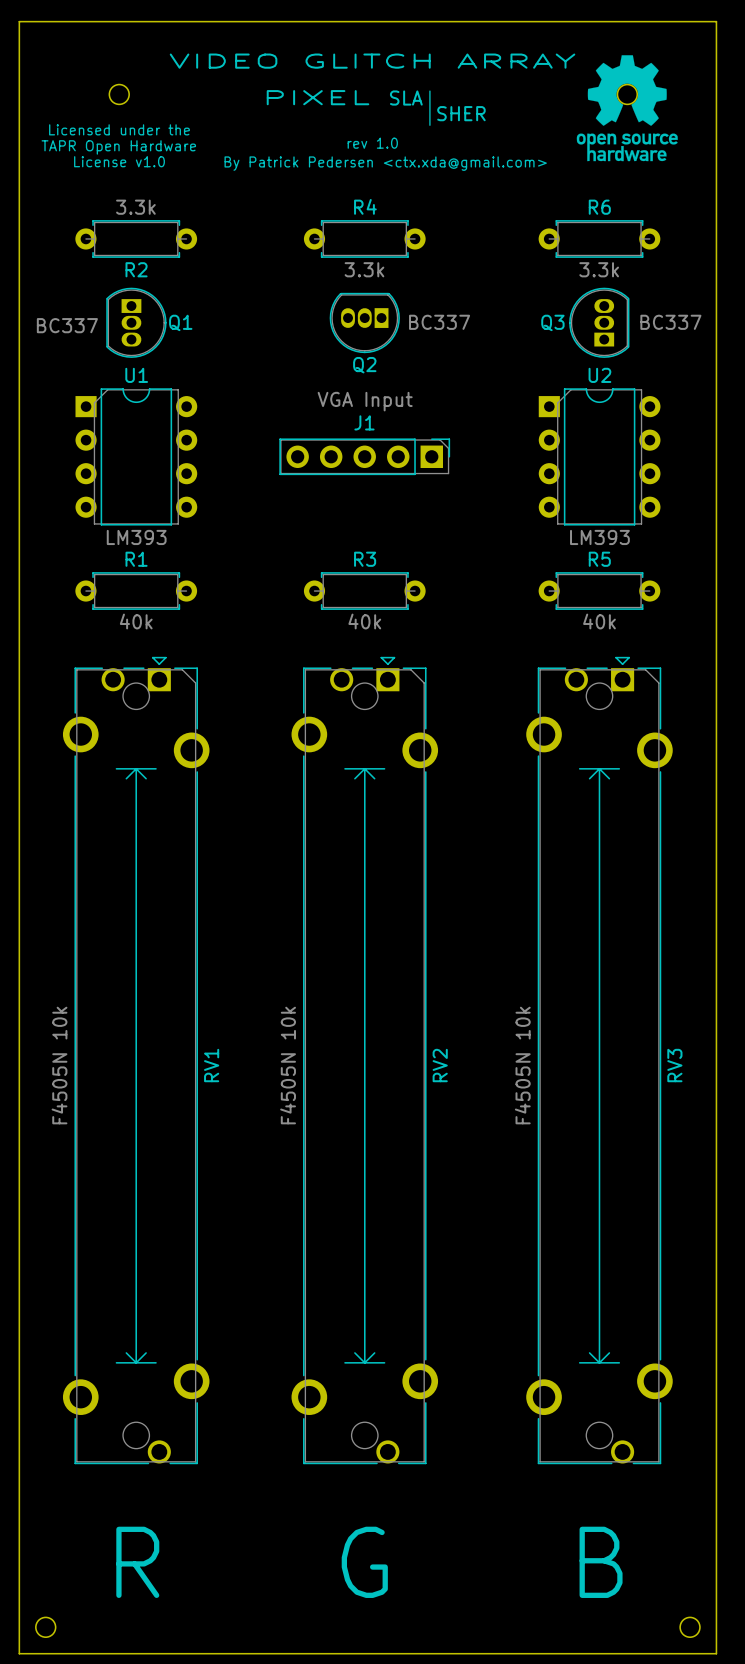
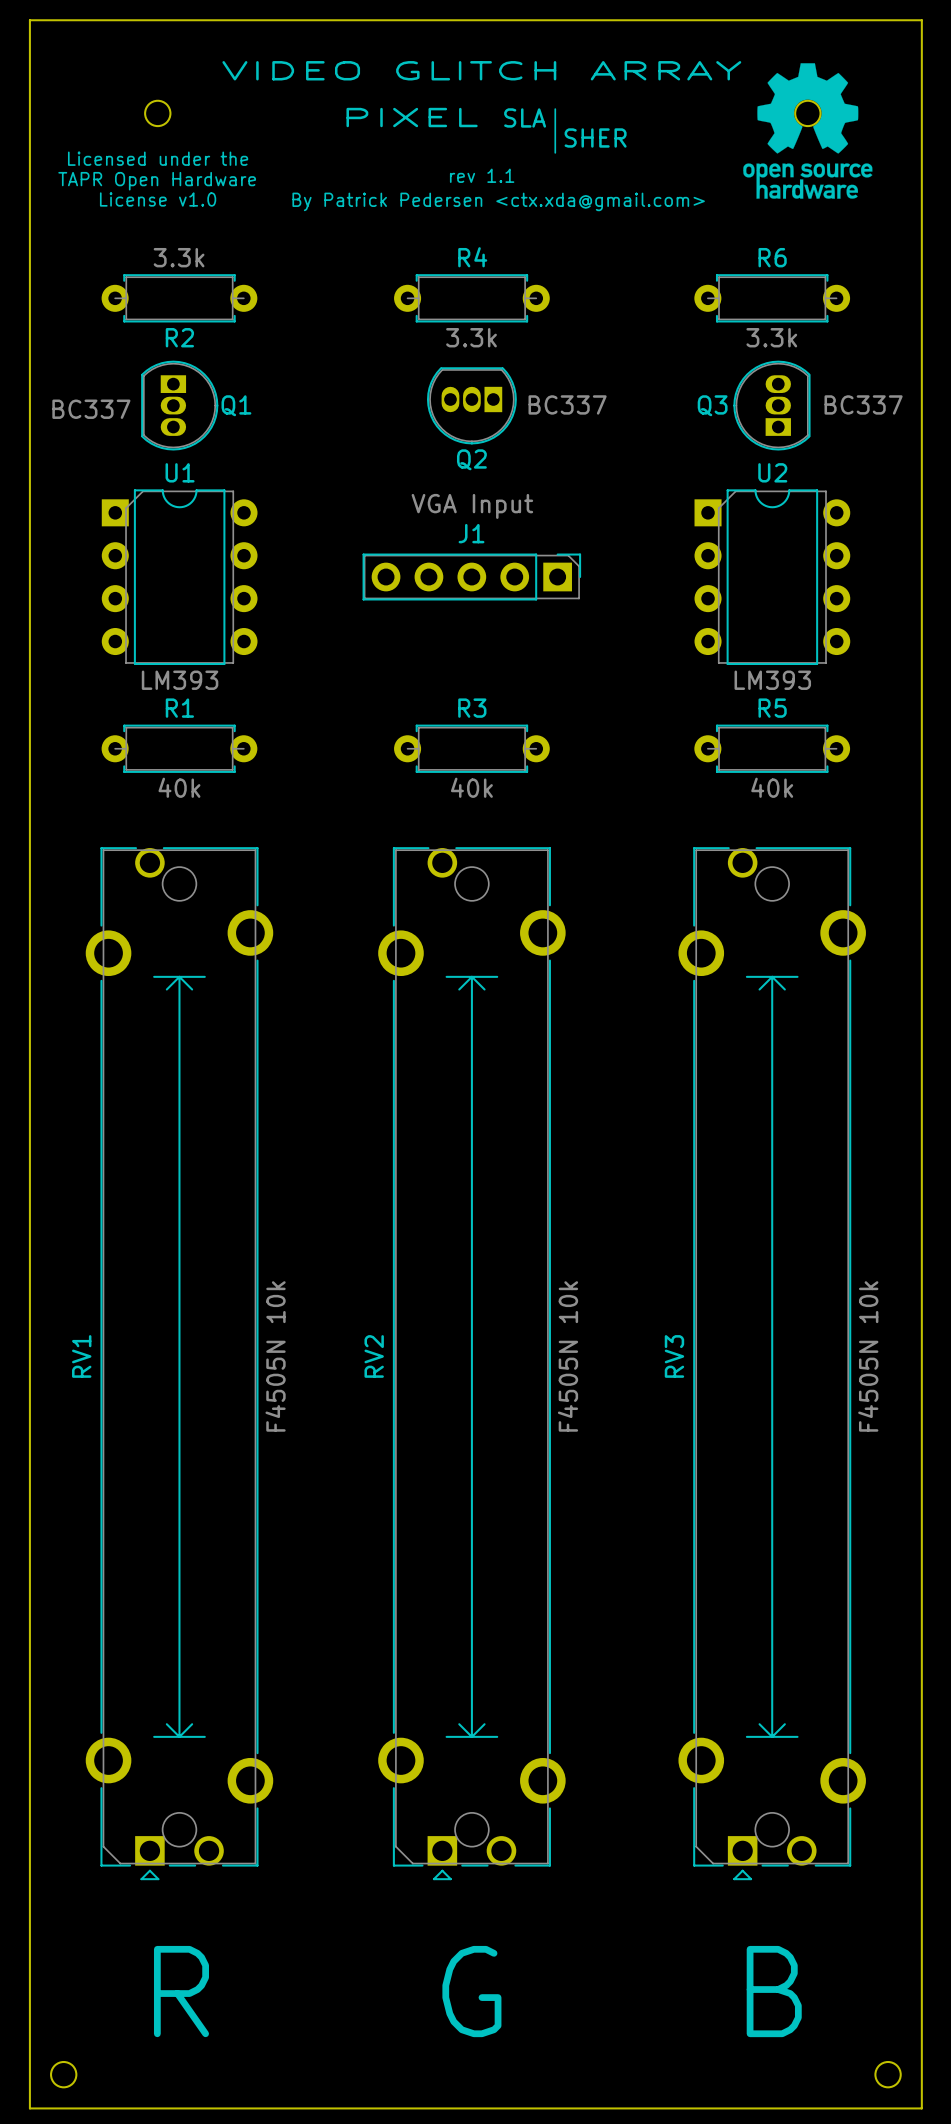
text: rev 1.0 (372, 143) -> rev 1.1 (482, 175)
RV1 rotation: 0° (136, 1060) -> 180° (179, 1363)
RV2 rotation: 0° (364, 1060) -> 180° (471, 1363)
RV3 rotation: 0° (599, 1060) -> 180° (772, 1363)

